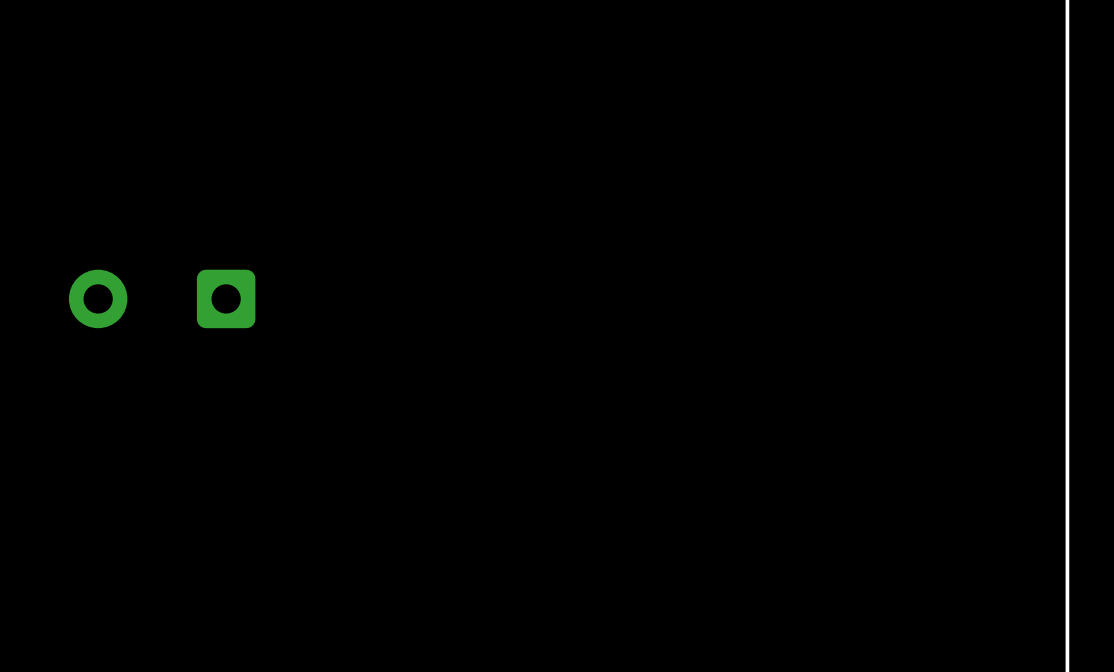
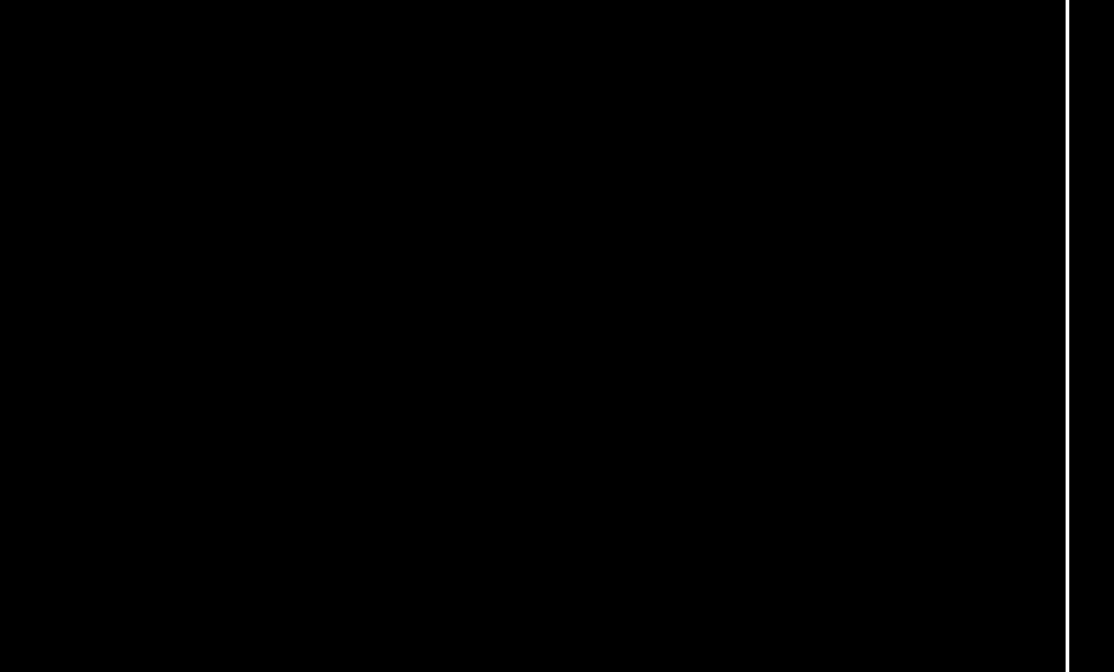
part: (162, 298) -> none

